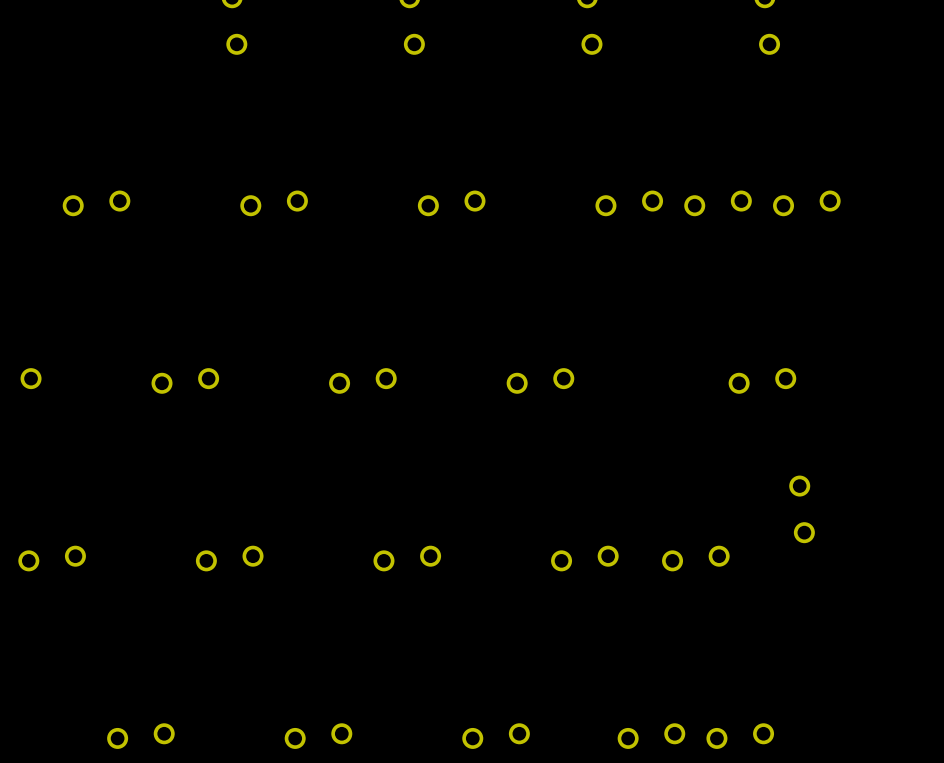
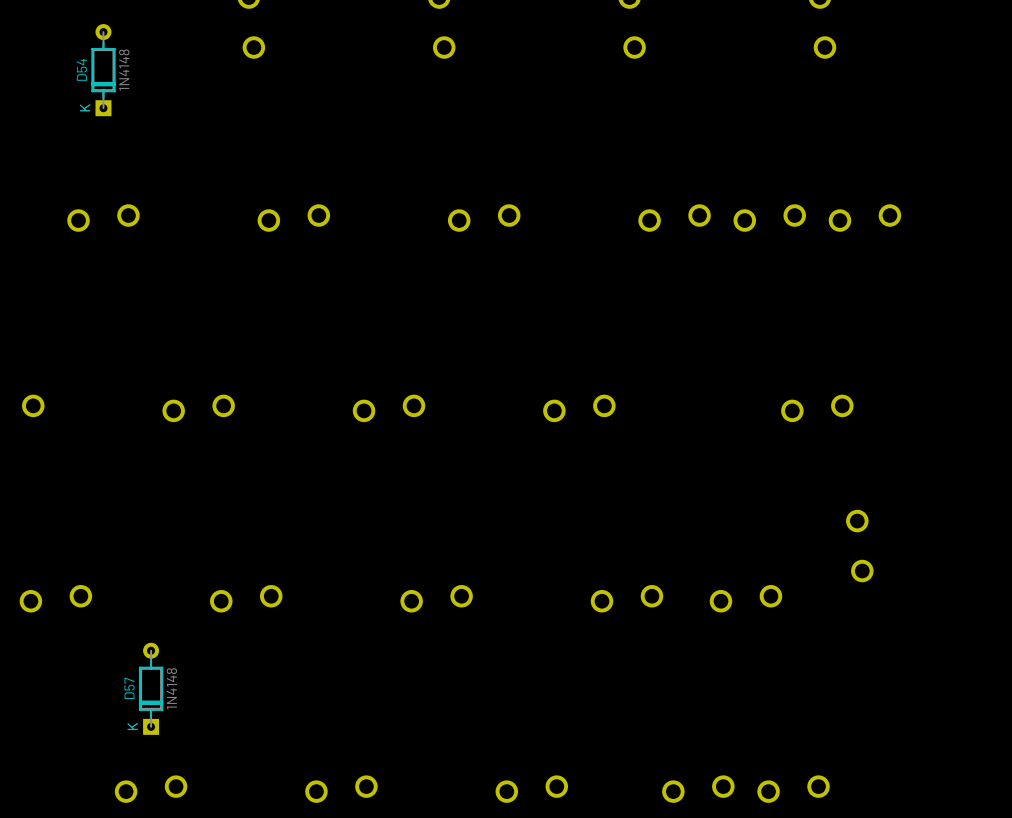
D54: none -> 1N4148 (103, 70)
D57: none -> 1N4148 (151, 688)

